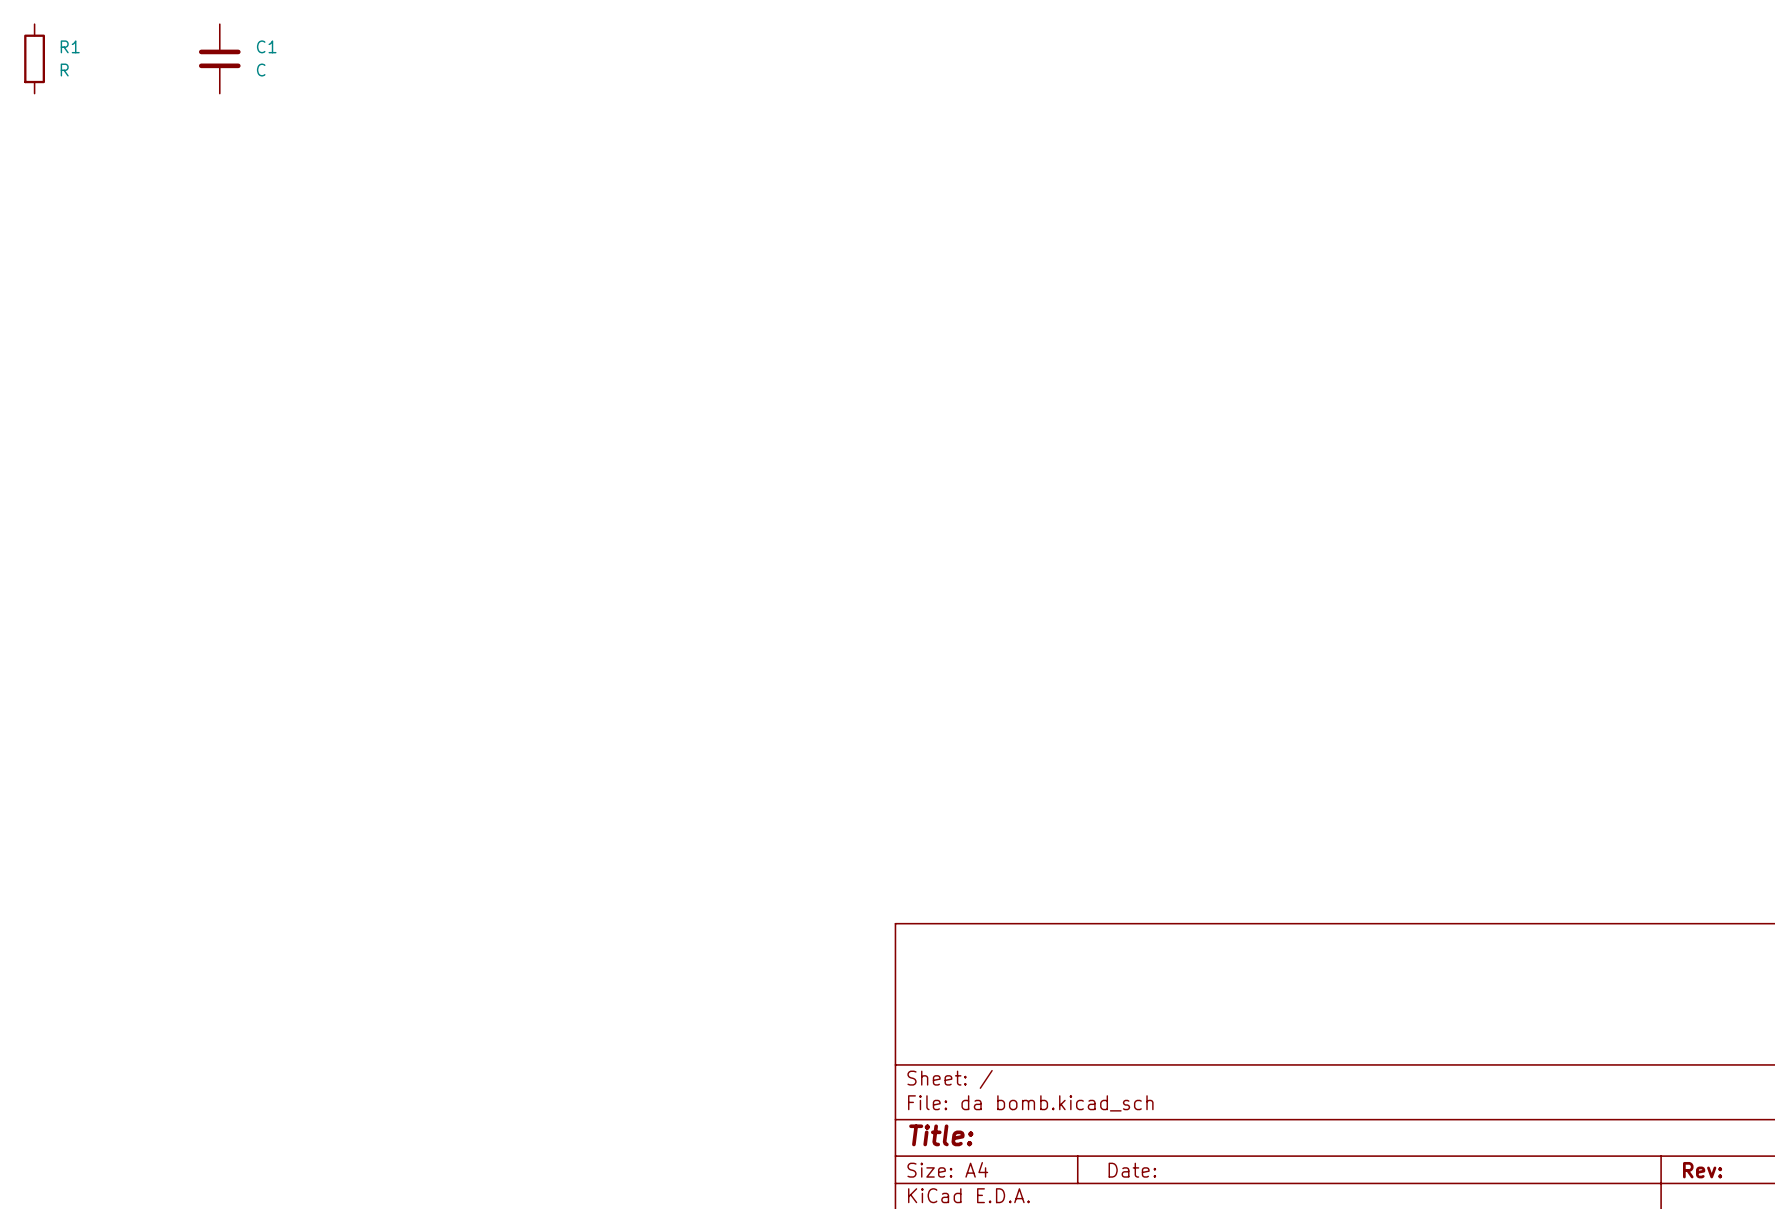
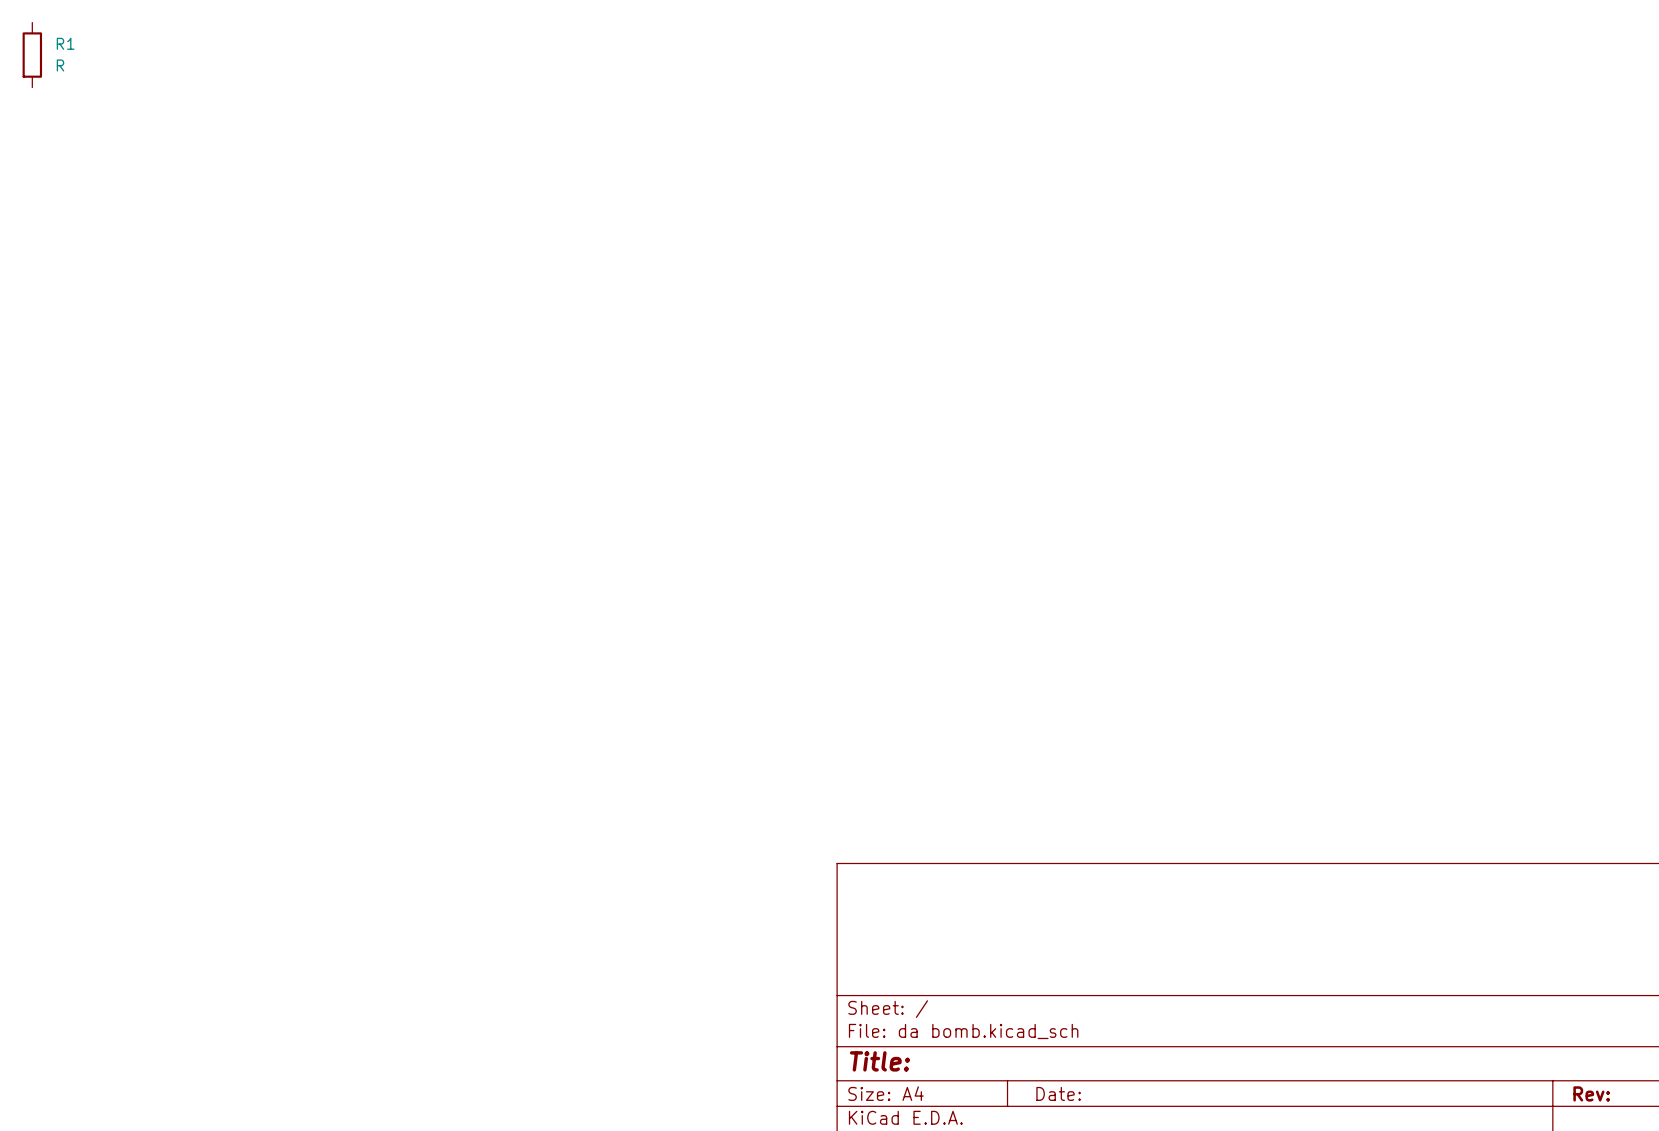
C1: C (219, 58) -> none

